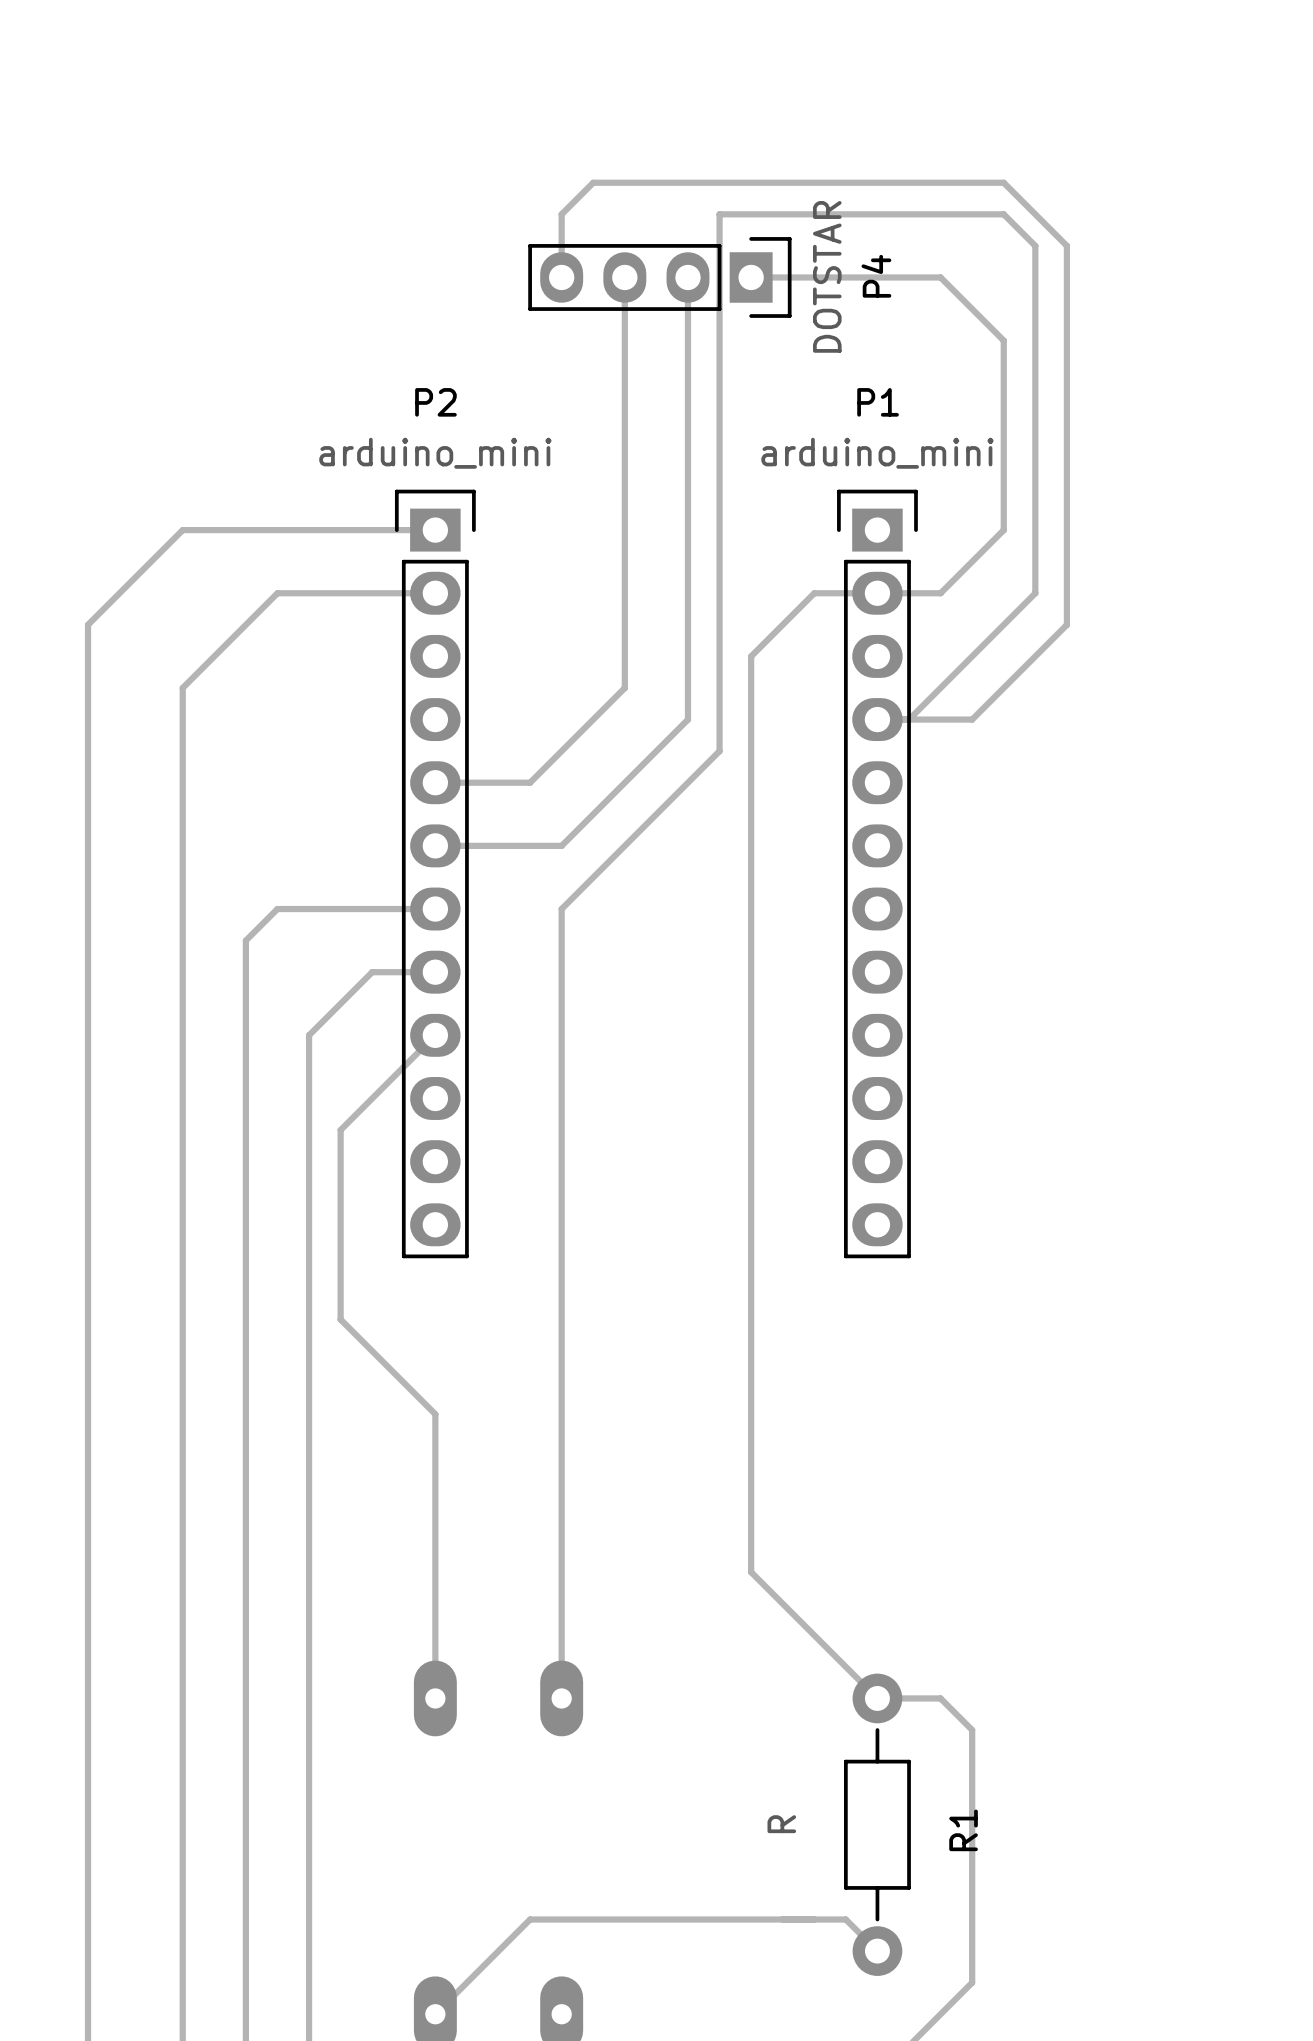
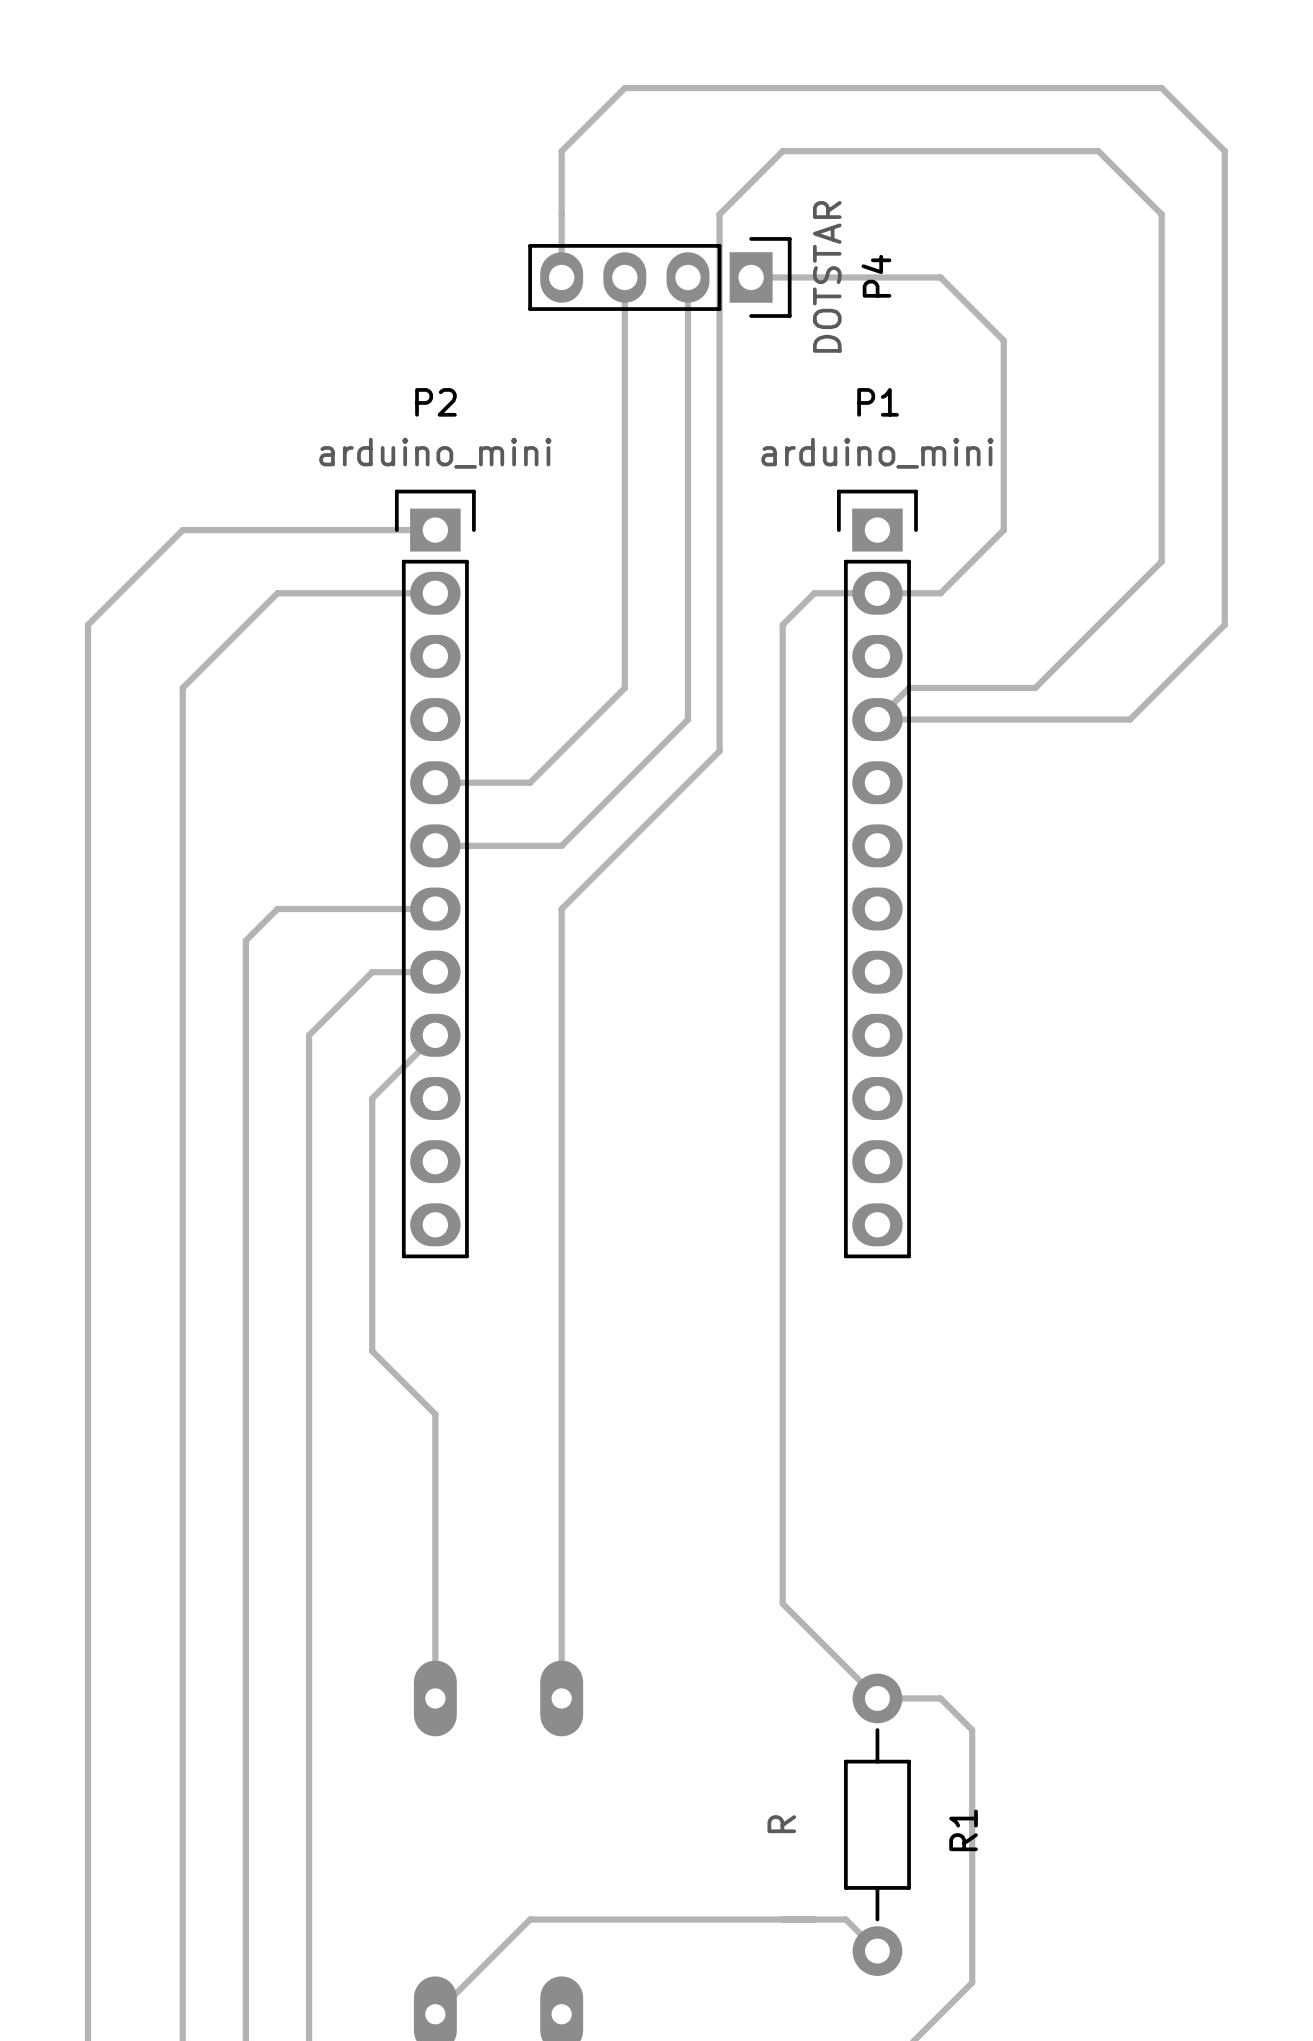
track: (561, 214) (593, 182) (1003, 182) (1066, 245) (1066, 624) (972, 719) -> (561, 214) (561, 151) (624, 88) (1161, 88) (1224, 151) (1224, 624) (1130, 719) (972, 719)
track: (719, 214) (1003, 214) (1035, 245) (1035, 593) (909, 719) -> (719, 214) (782, 151) (1098, 151) (1161, 214) (1161, 561) (1035, 687) (909, 687) (877, 719)
track: (782, 624) (751, 656) (751, 1572) (782, 1603) -> (782, 624) (782, 1603)
track: (372, 1098) (340, 1130) (340, 1319) (372, 1351) -> (372, 1098) (372, 1351)

